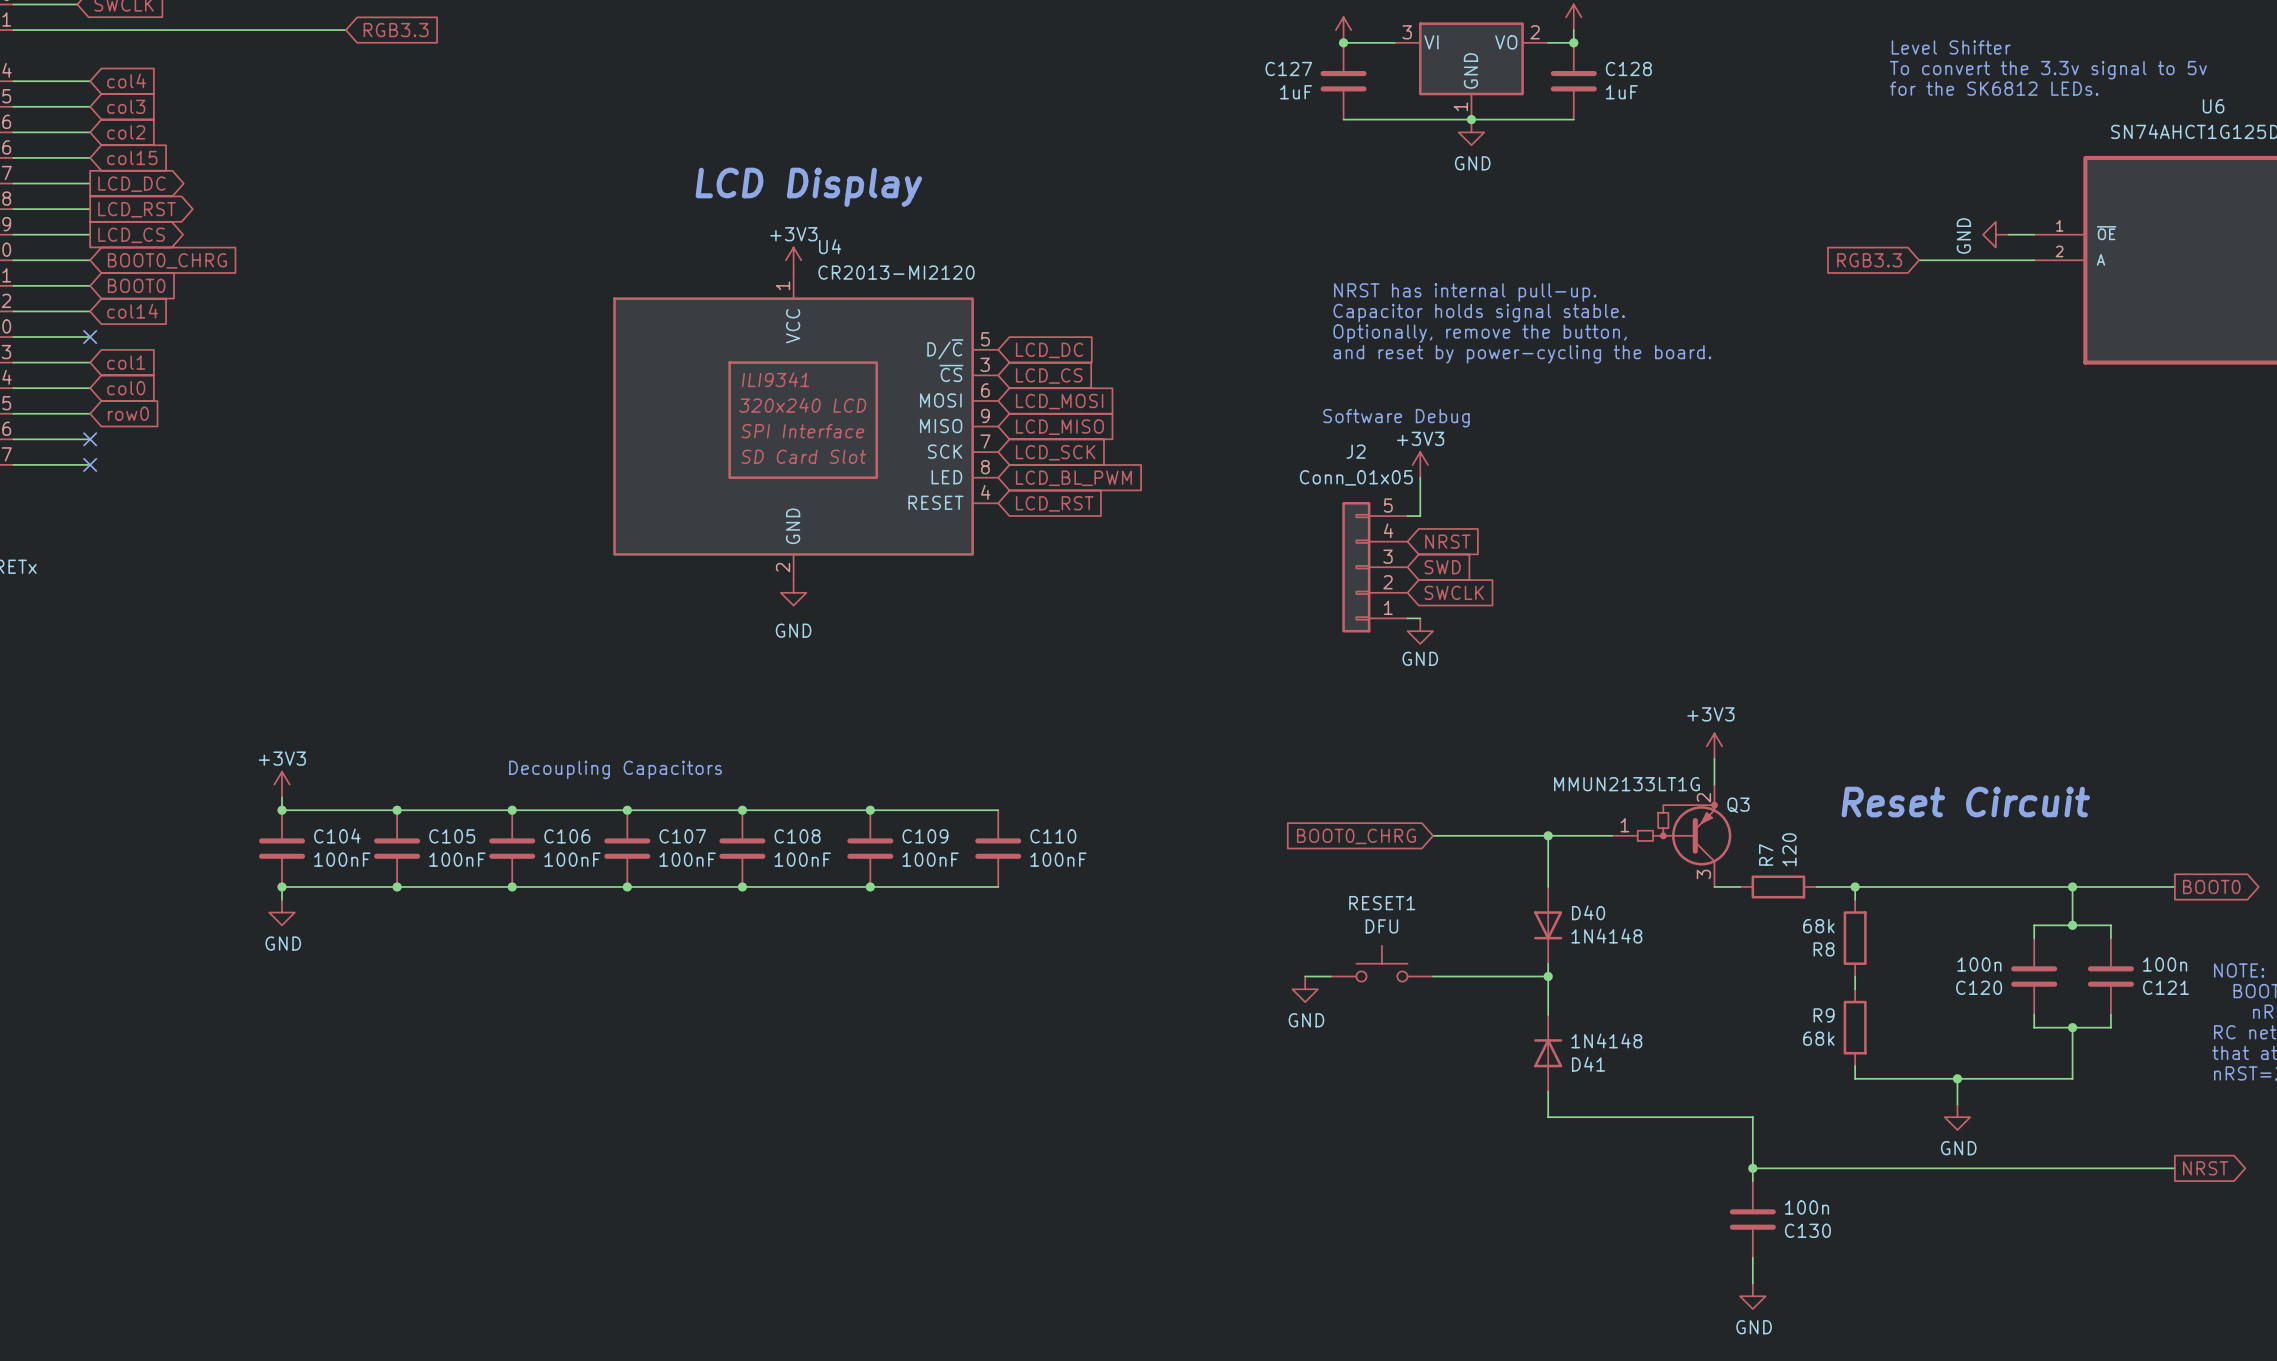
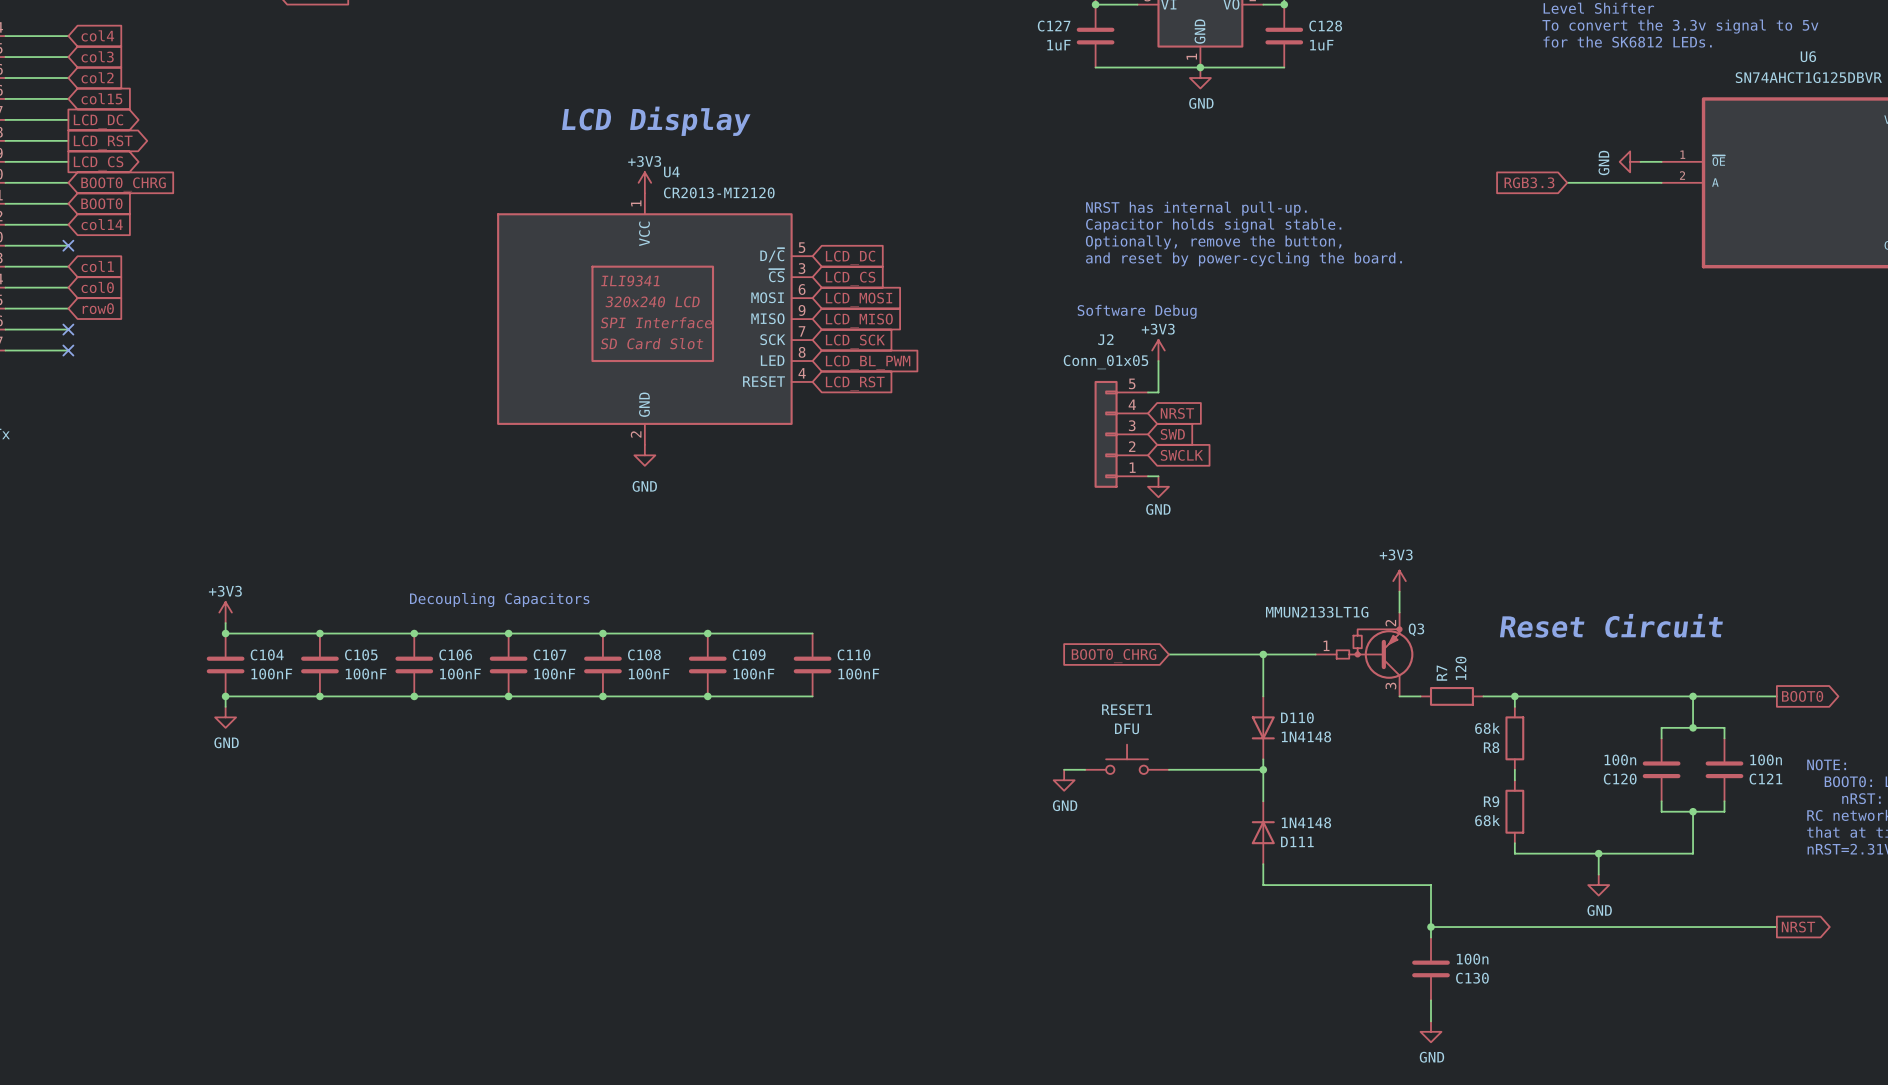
D40 name: D40 (1588, 912) -> D110 (1297, 717)
D41 name: D41 (1588, 1064) -> D111 (1297, 841)

